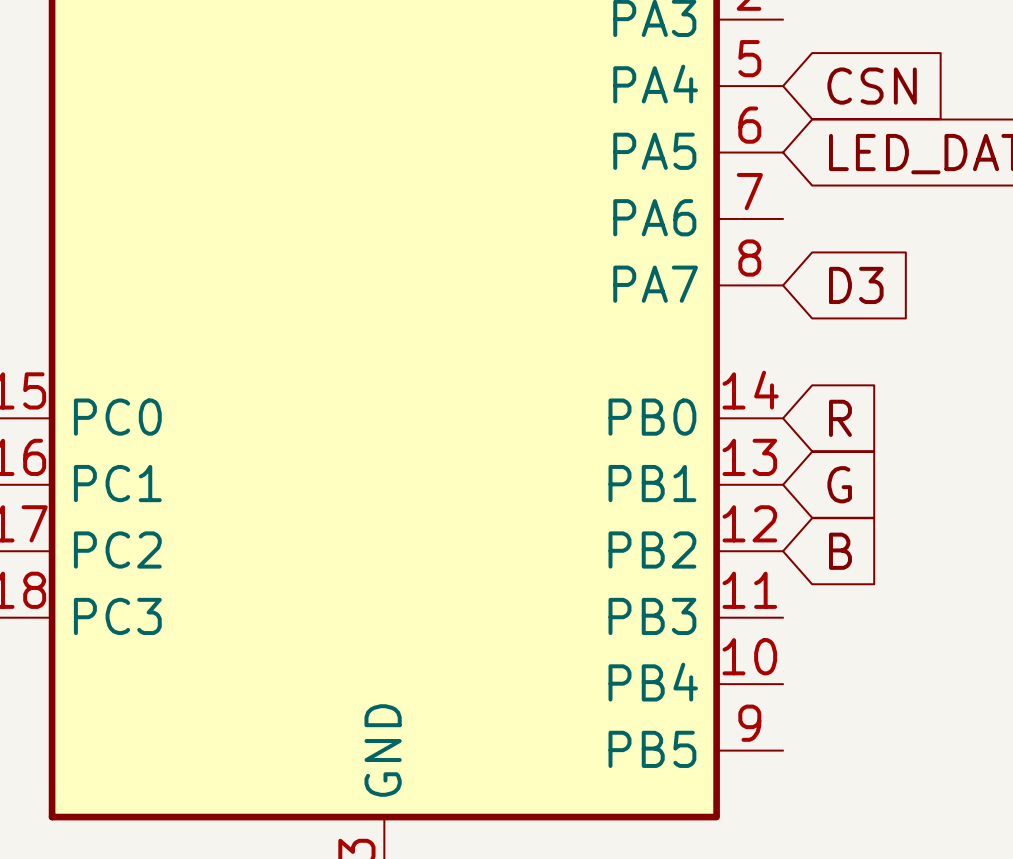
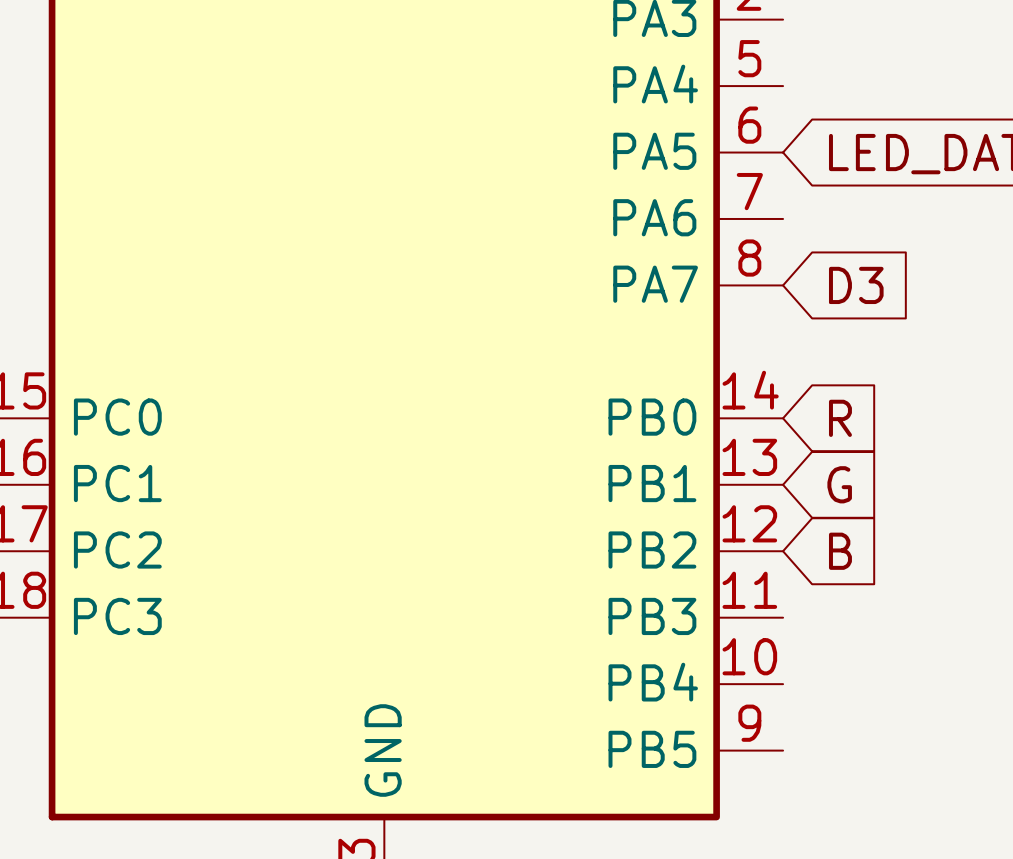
global label: CSN (872, 86) -> none

